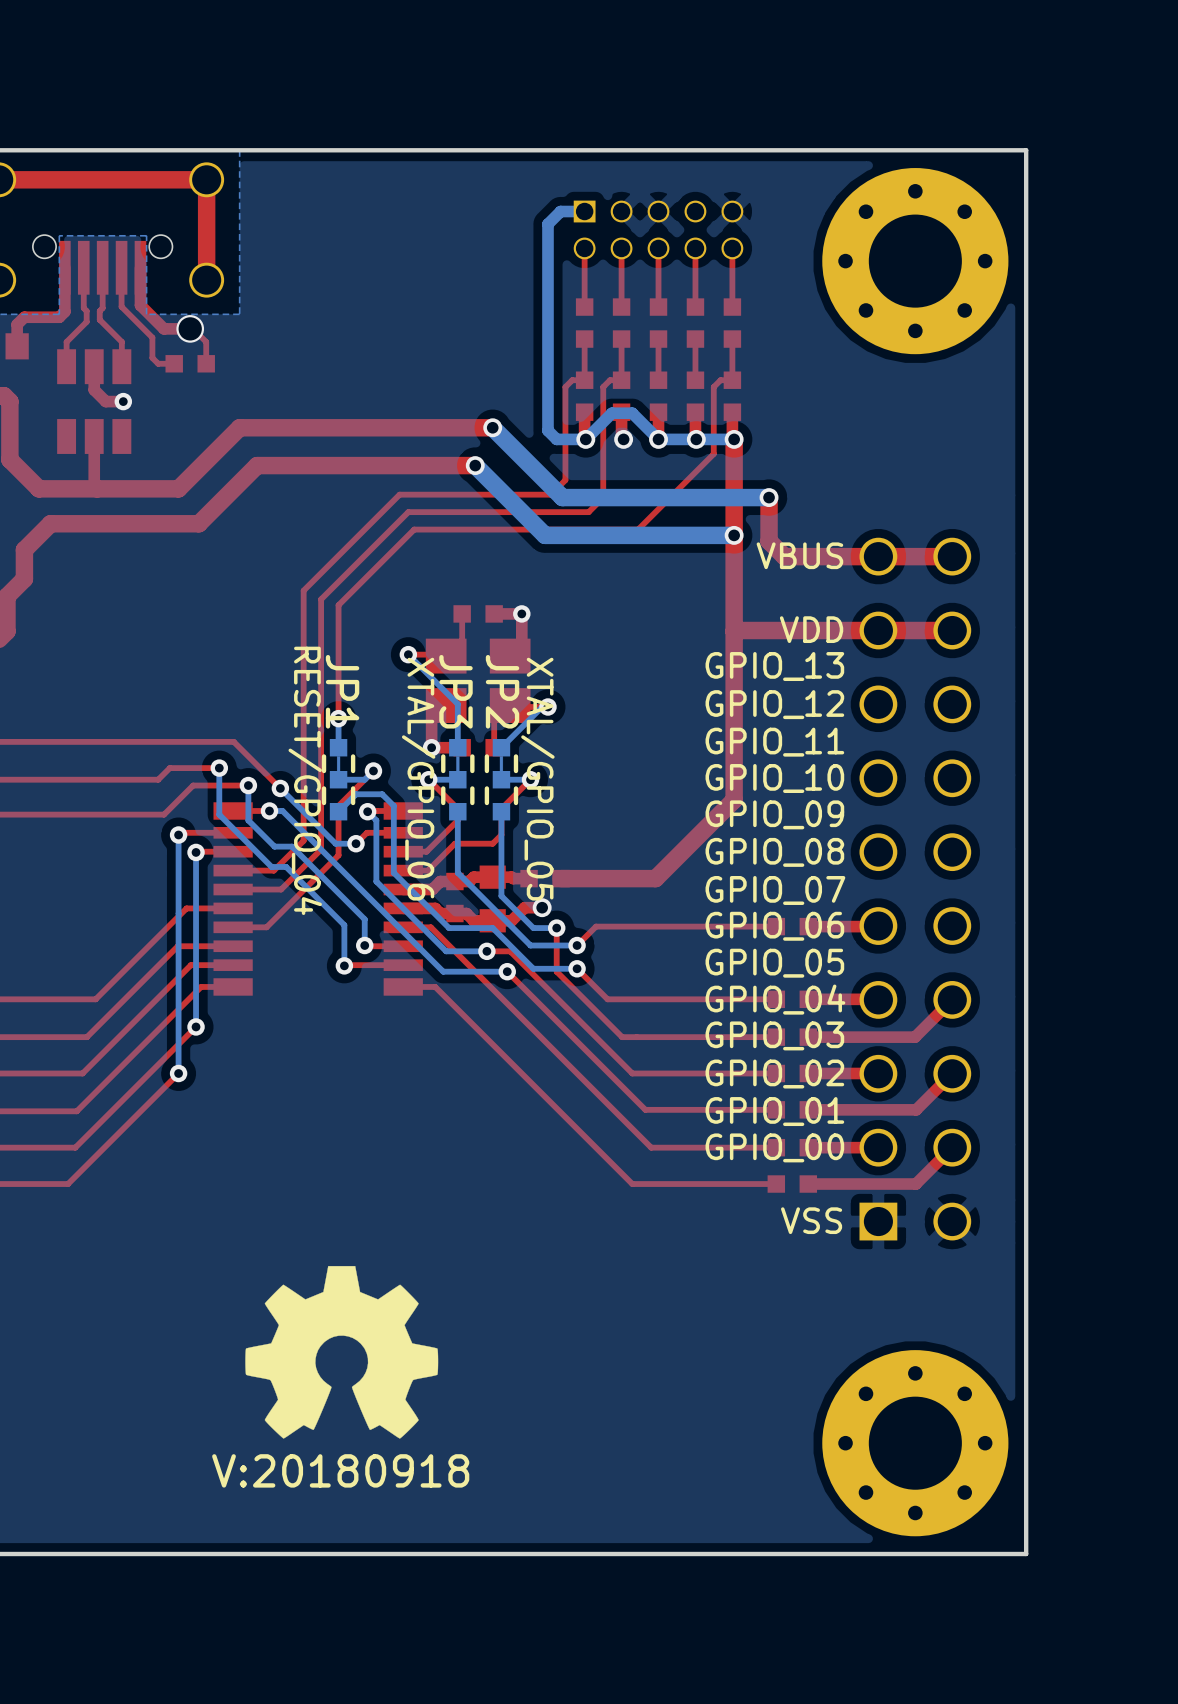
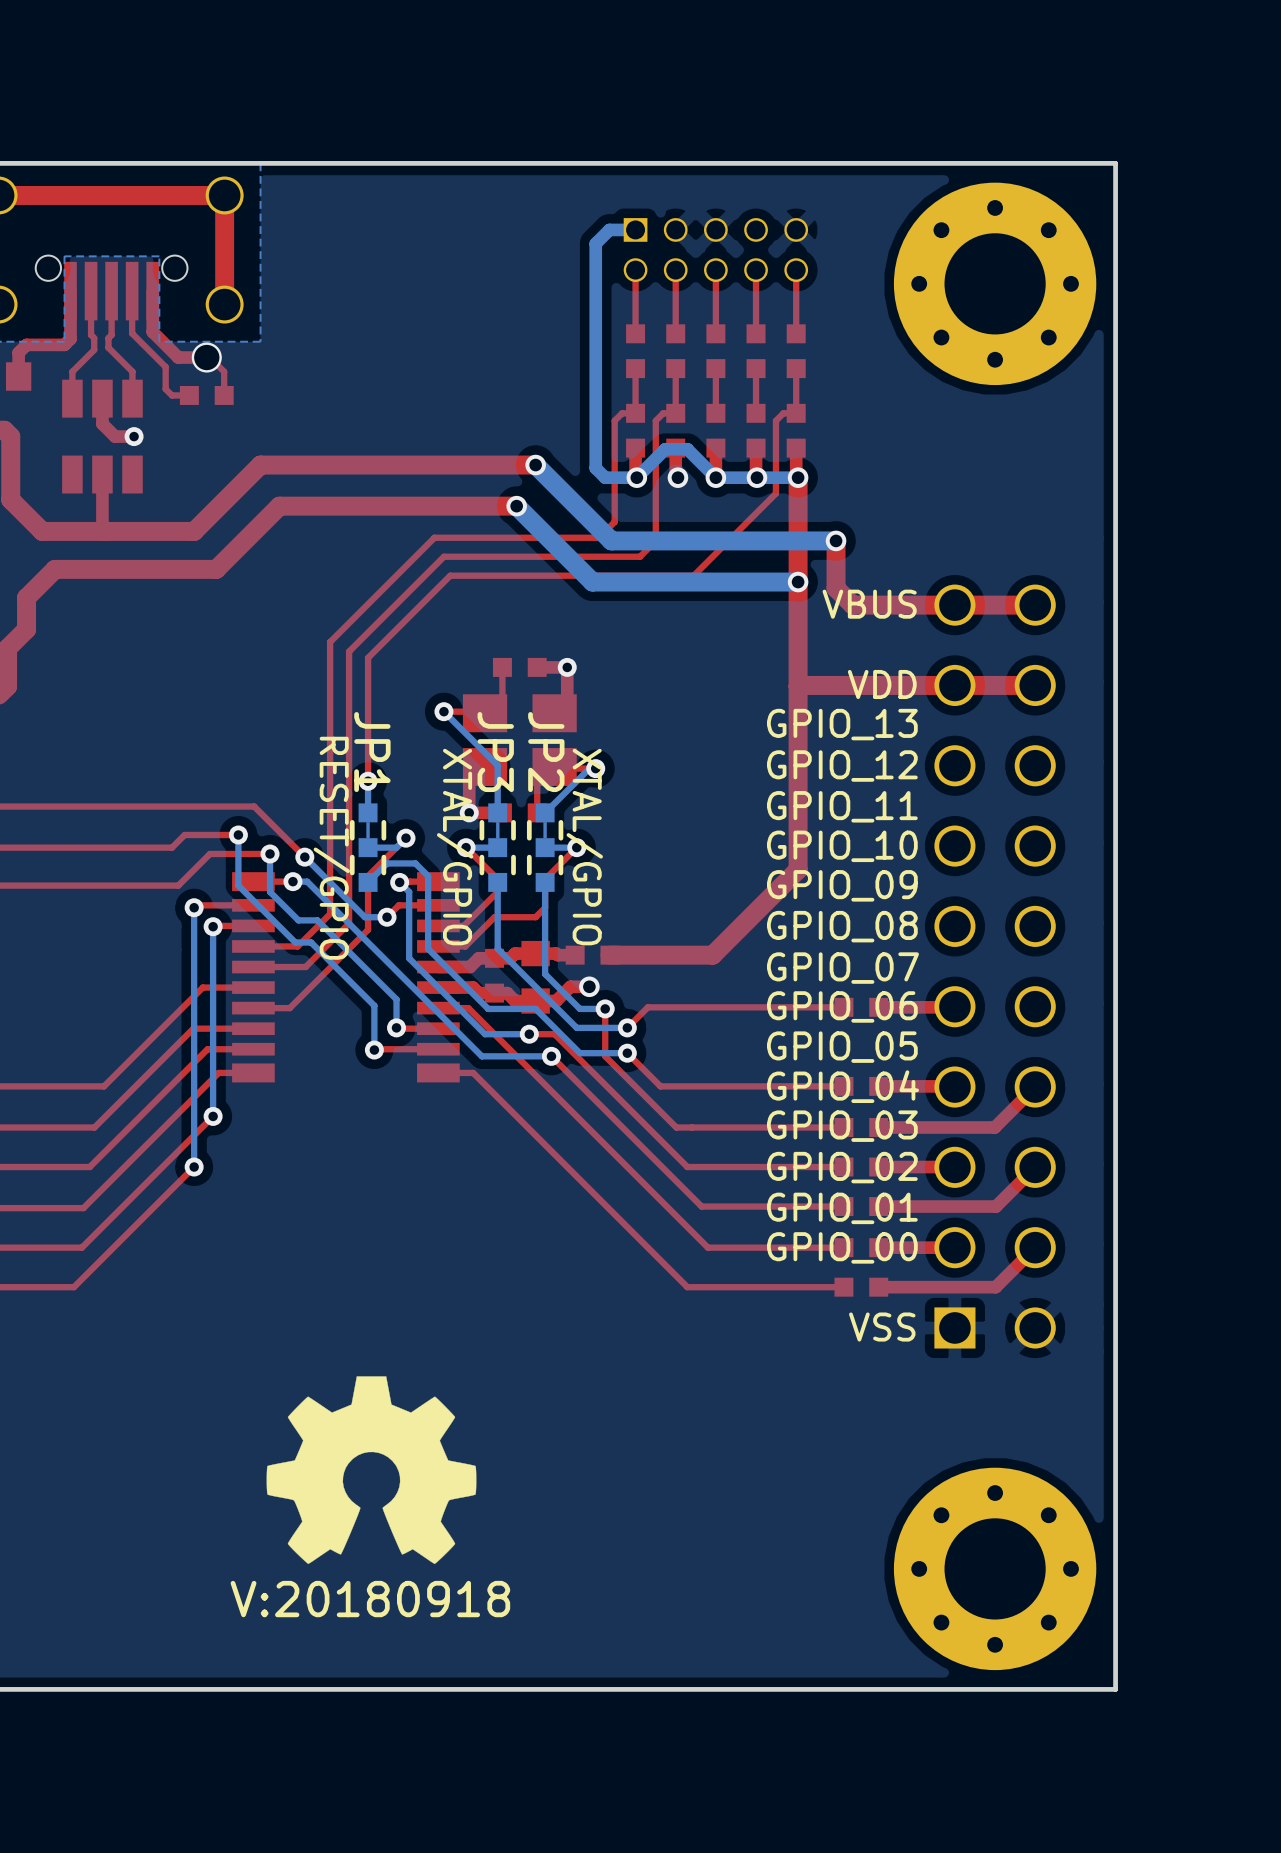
JP3 value: XTAL/GPIO_06 (418, 779) -> XTAL/GPIO (455, 847)
JP2 value: XTAL/GPIO_05 (537, 779) -> XTAL/GPIO (584, 847)
JP1 value: RESET/GPIO_04 (305, 780) -> RESET/GPIO (331, 848)

